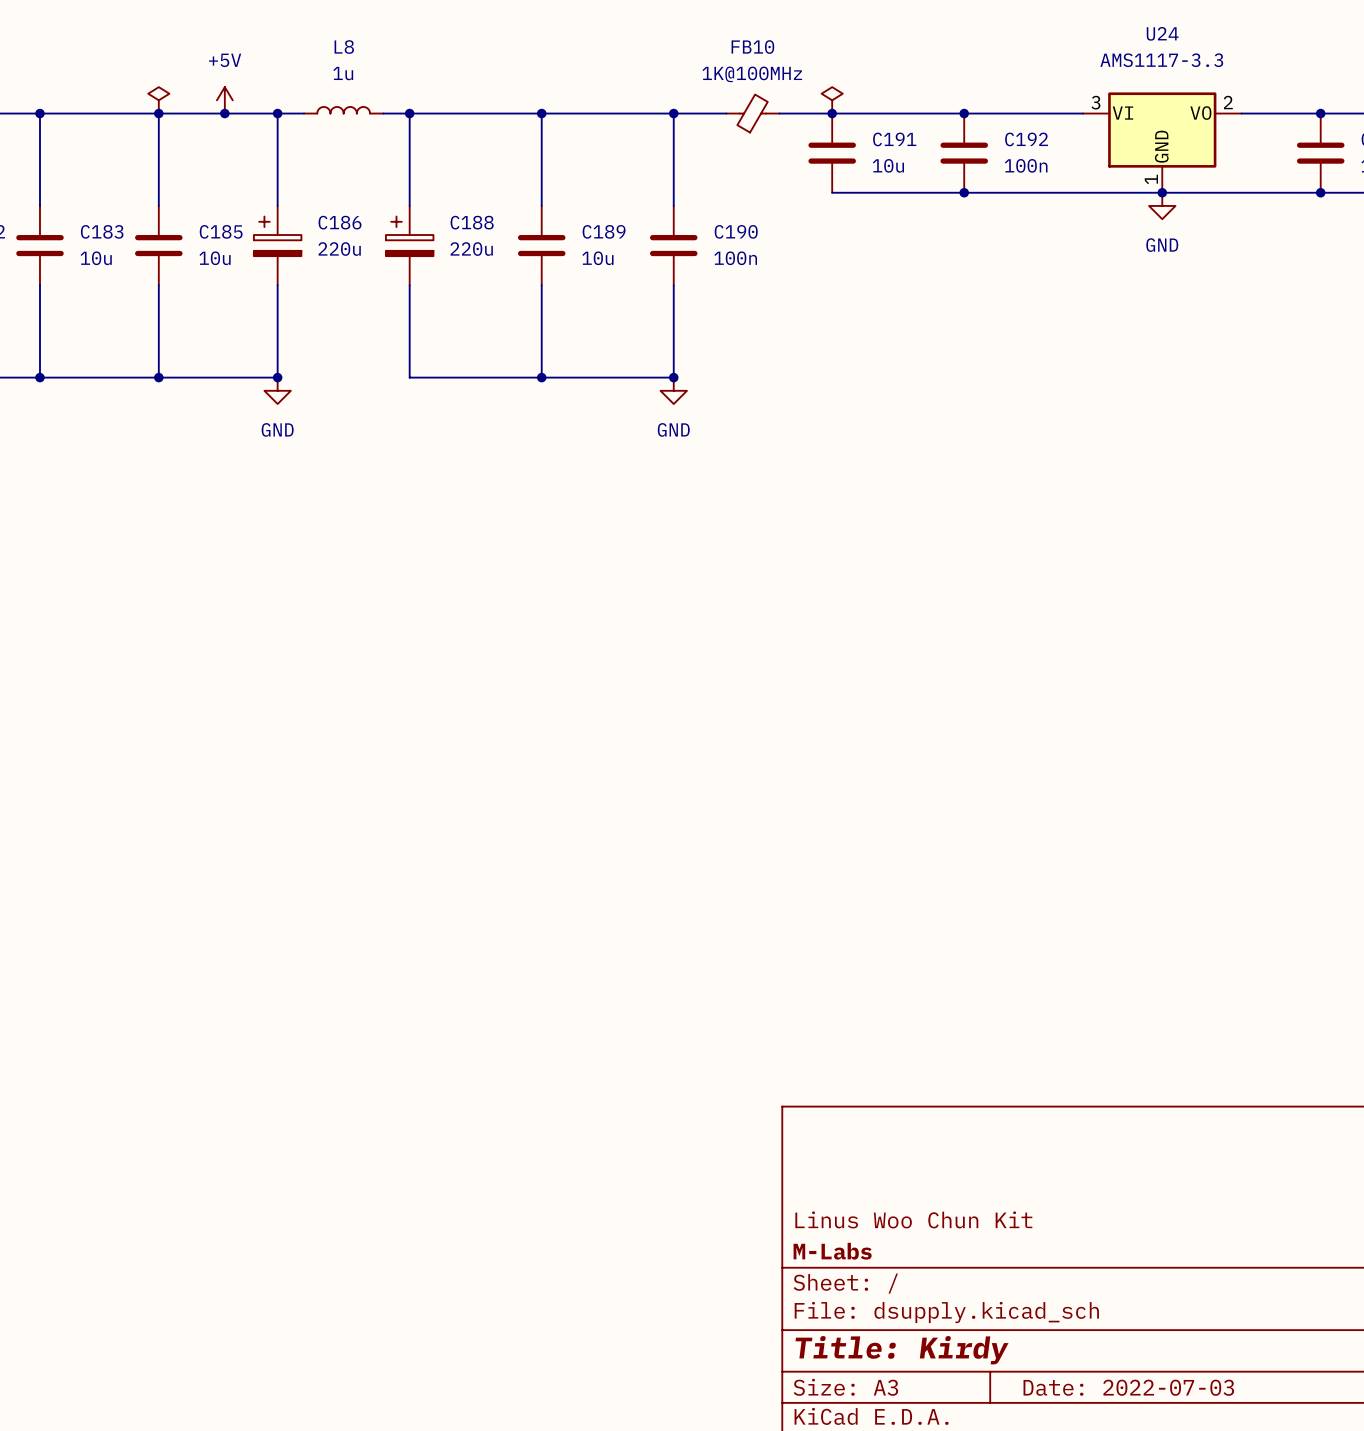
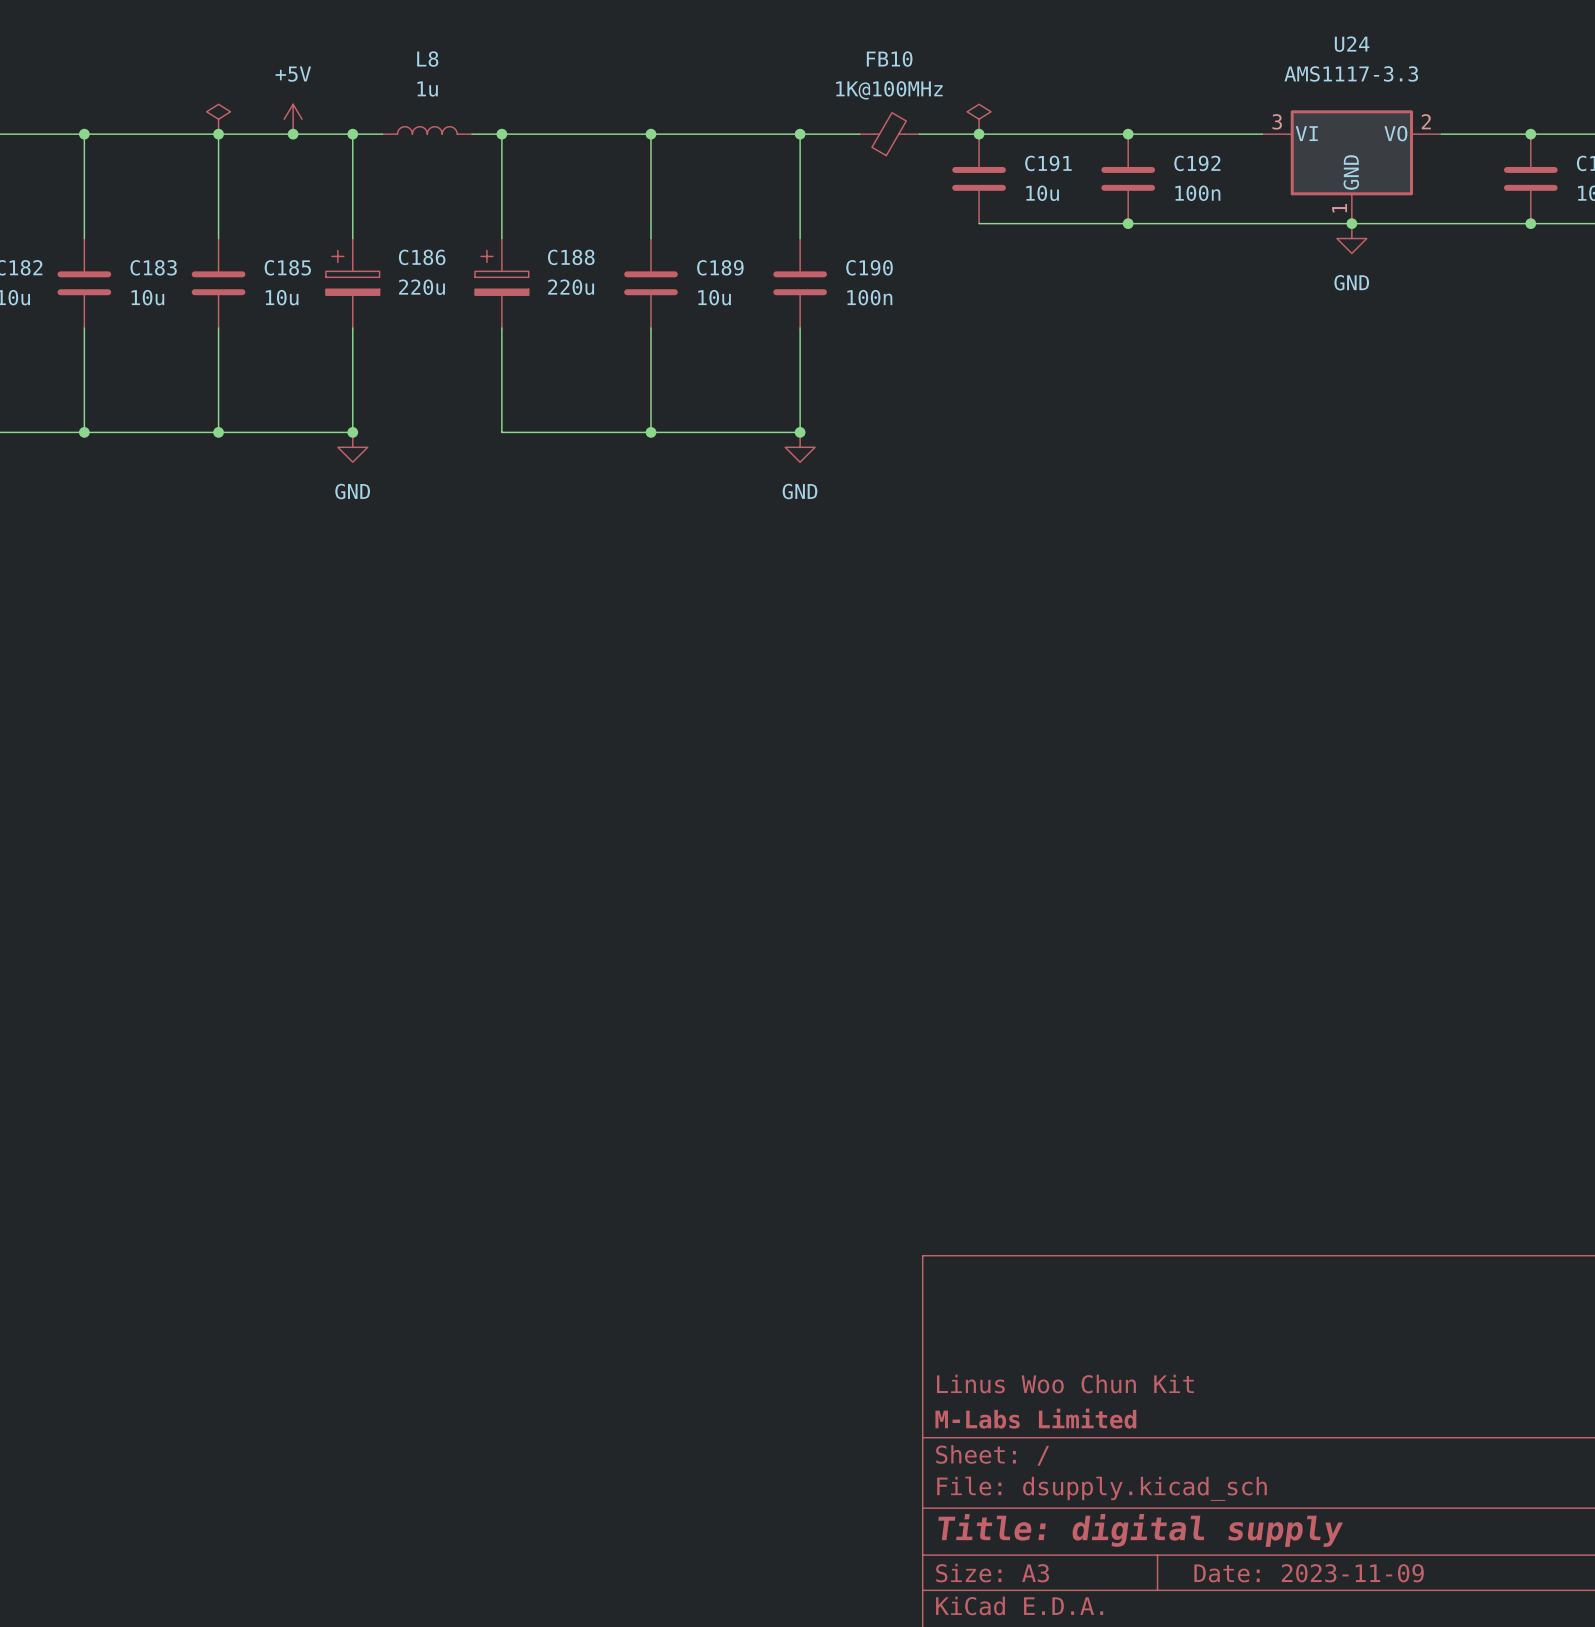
title block: M-Labs (832, 1251) -> M-Labs Limited (1035, 1418)
title block: Title: Kirdy (902, 1350) -> Title: digital supply (1140, 1530)
title block: Date: 2022-07-03 (1128, 1387) -> Date: 2023-11-09 (1309, 1573)

